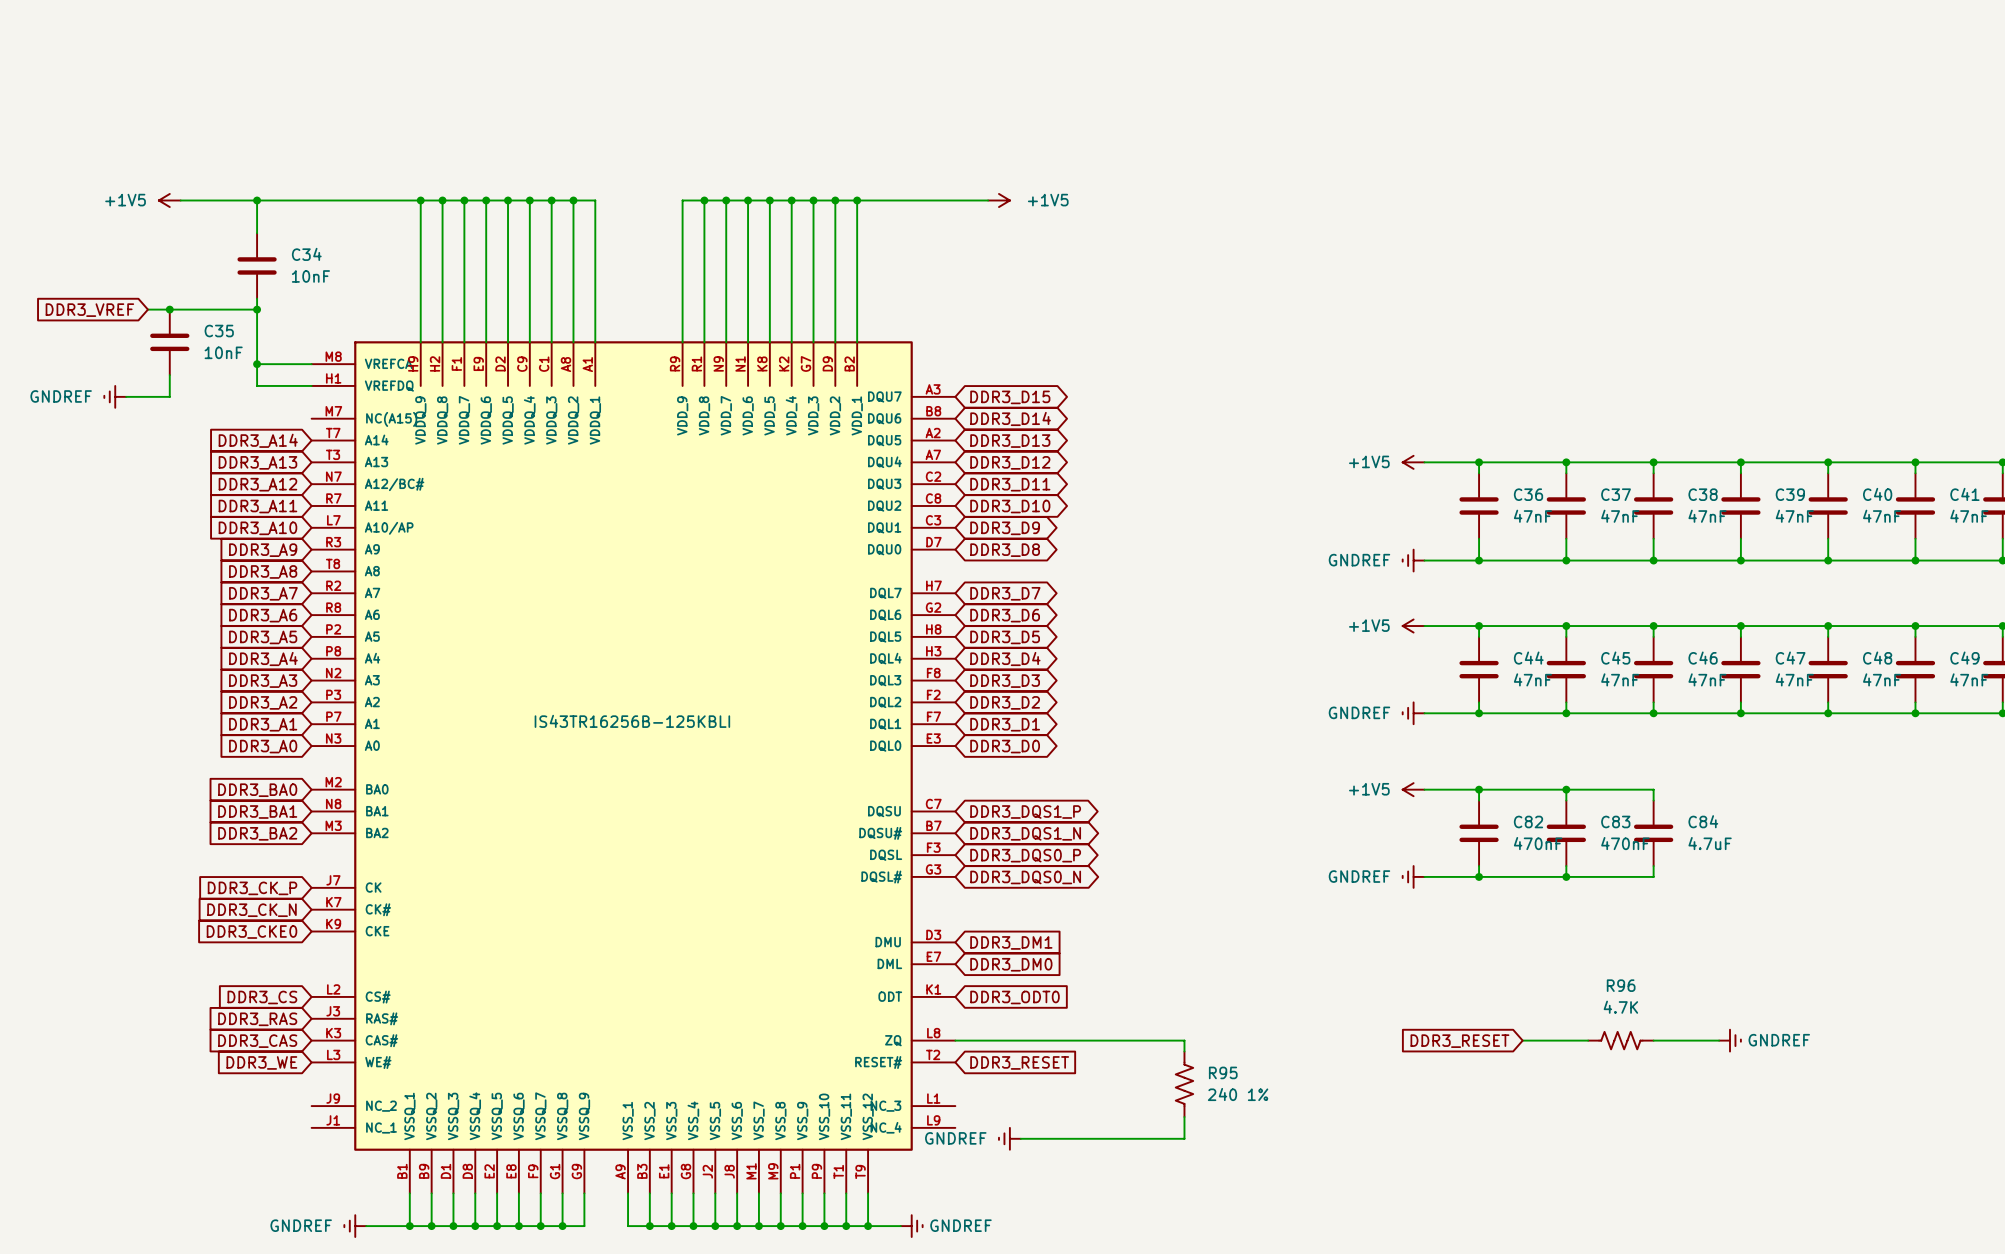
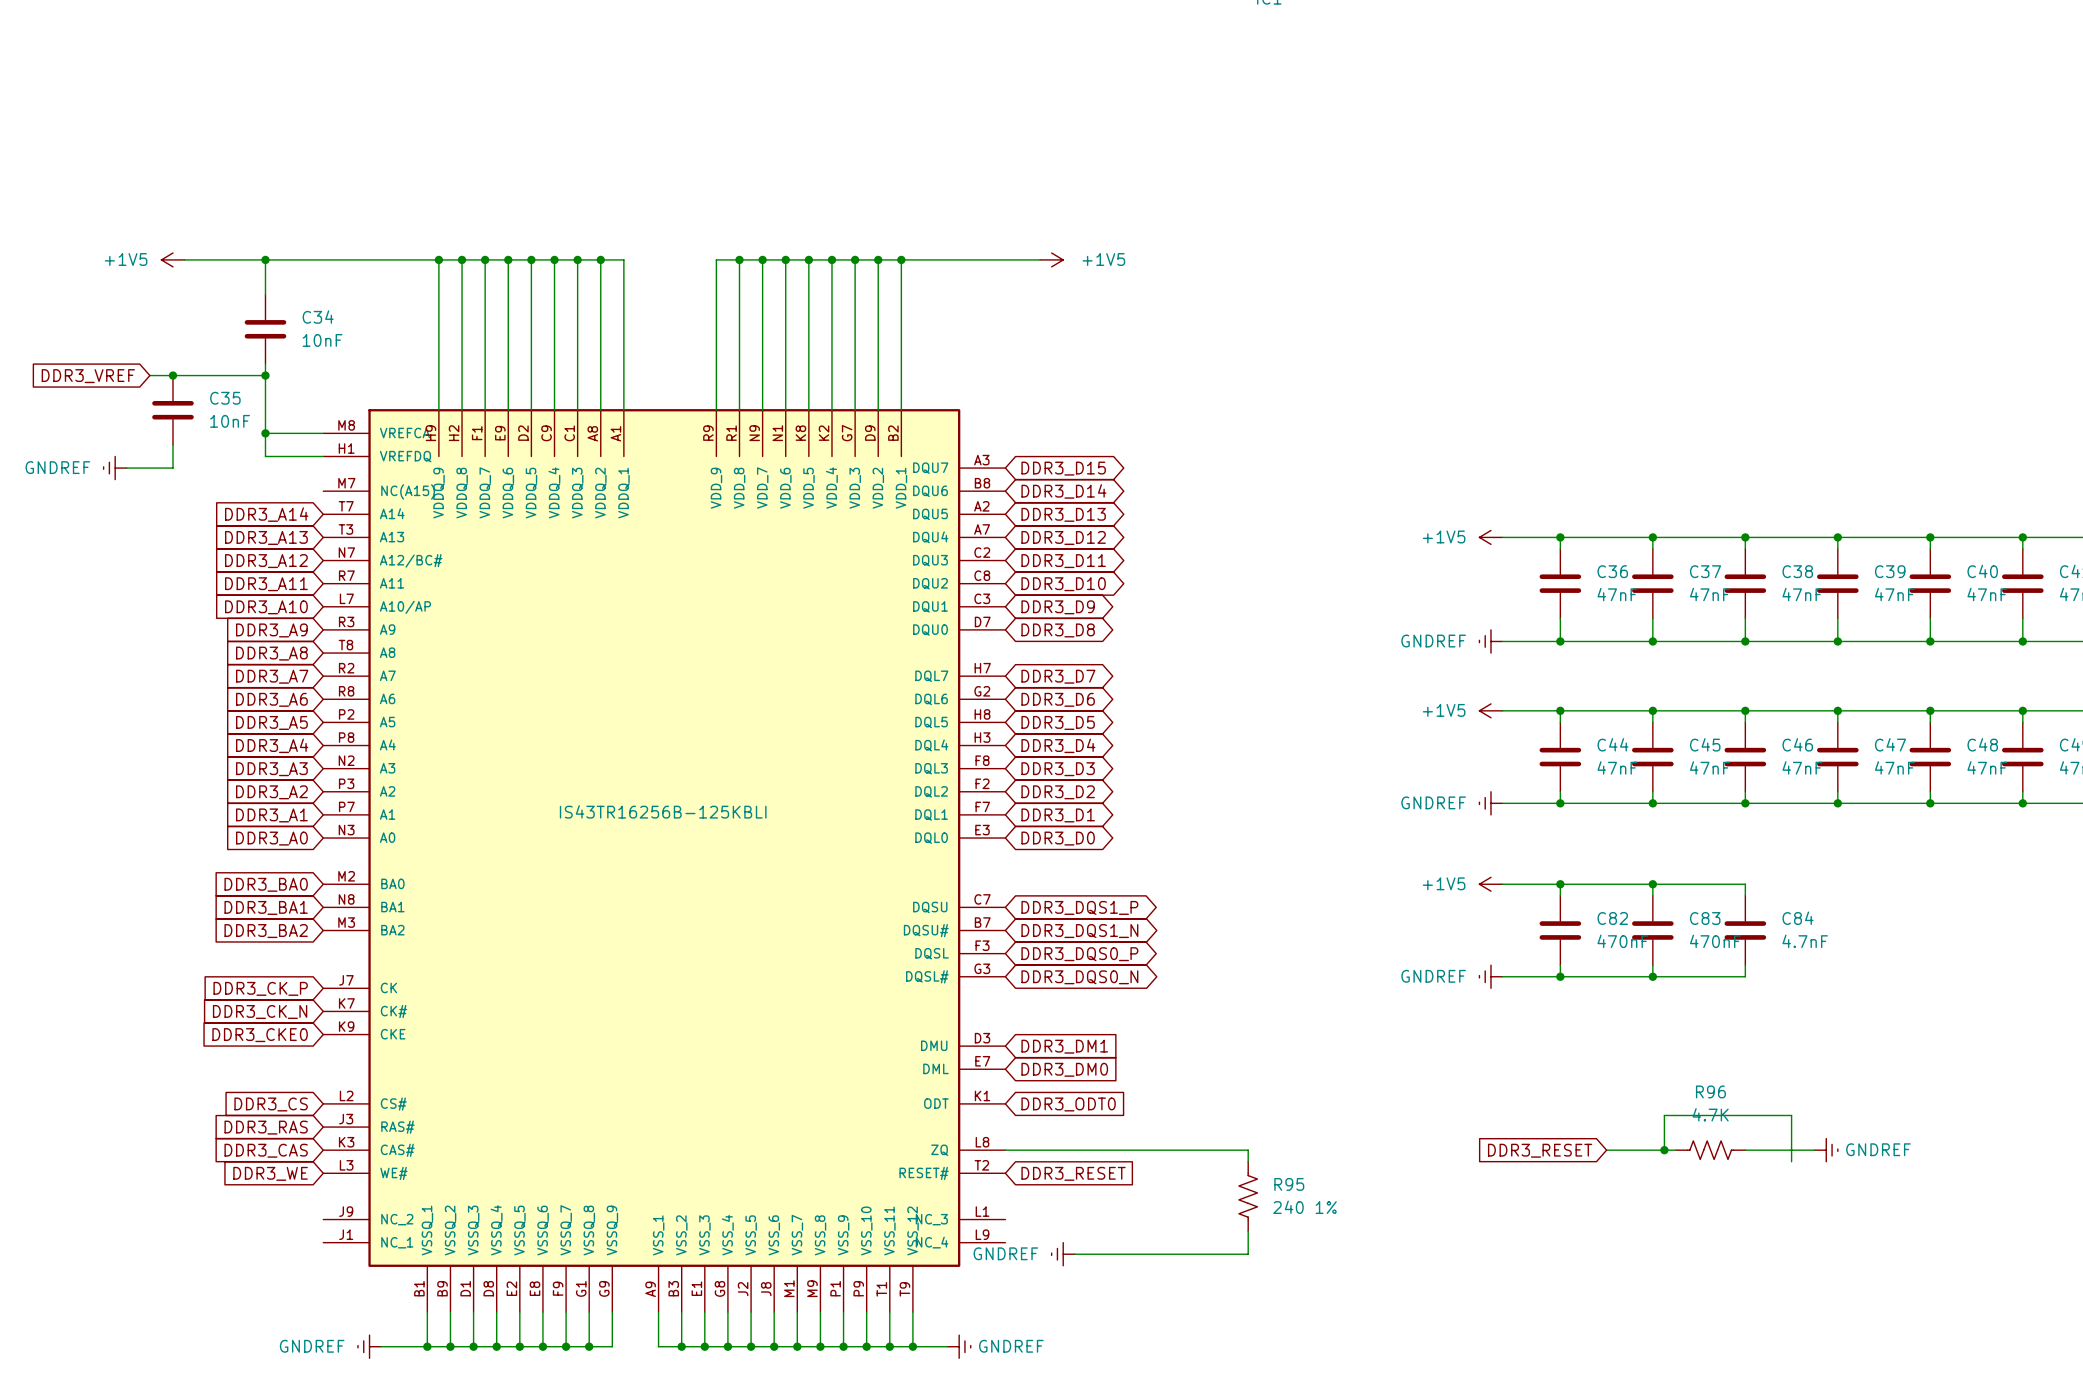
C84 value: 4.7uF (1710, 843) -> 4.7nF (1805, 941)
wire: none -> (1664, 1150) (1664, 1115) (1791, 1115) (1791, 1161)
junction: none -> (1664, 1150)

